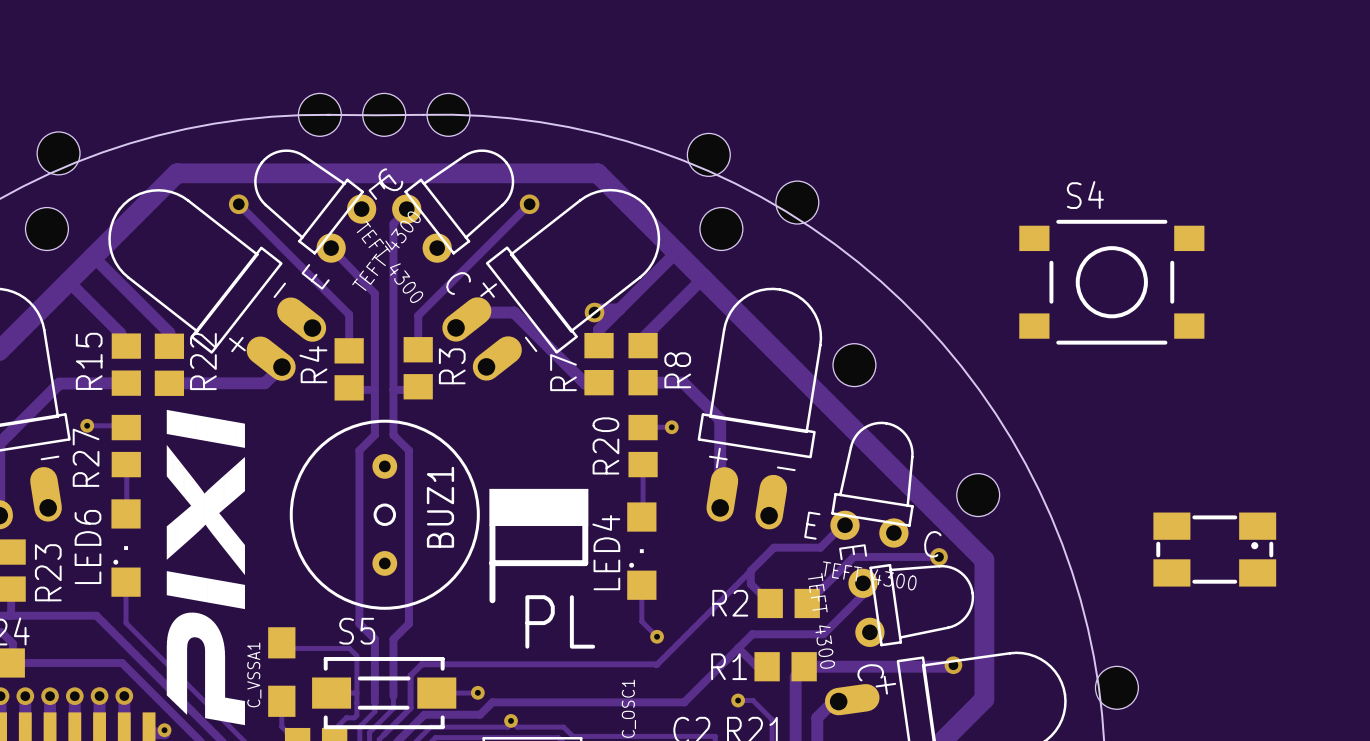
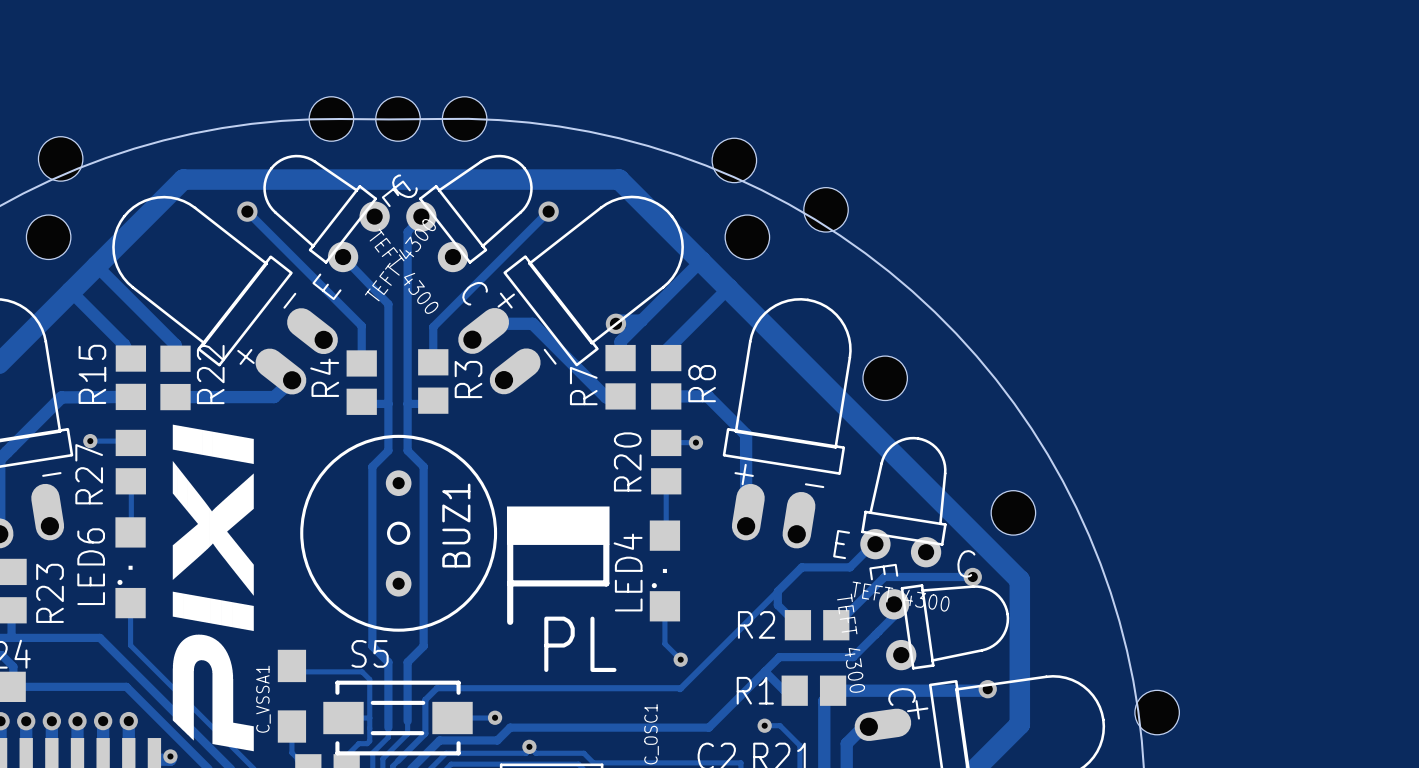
S4: (1111, 282) -> none
part: (1214, 549) -> none

